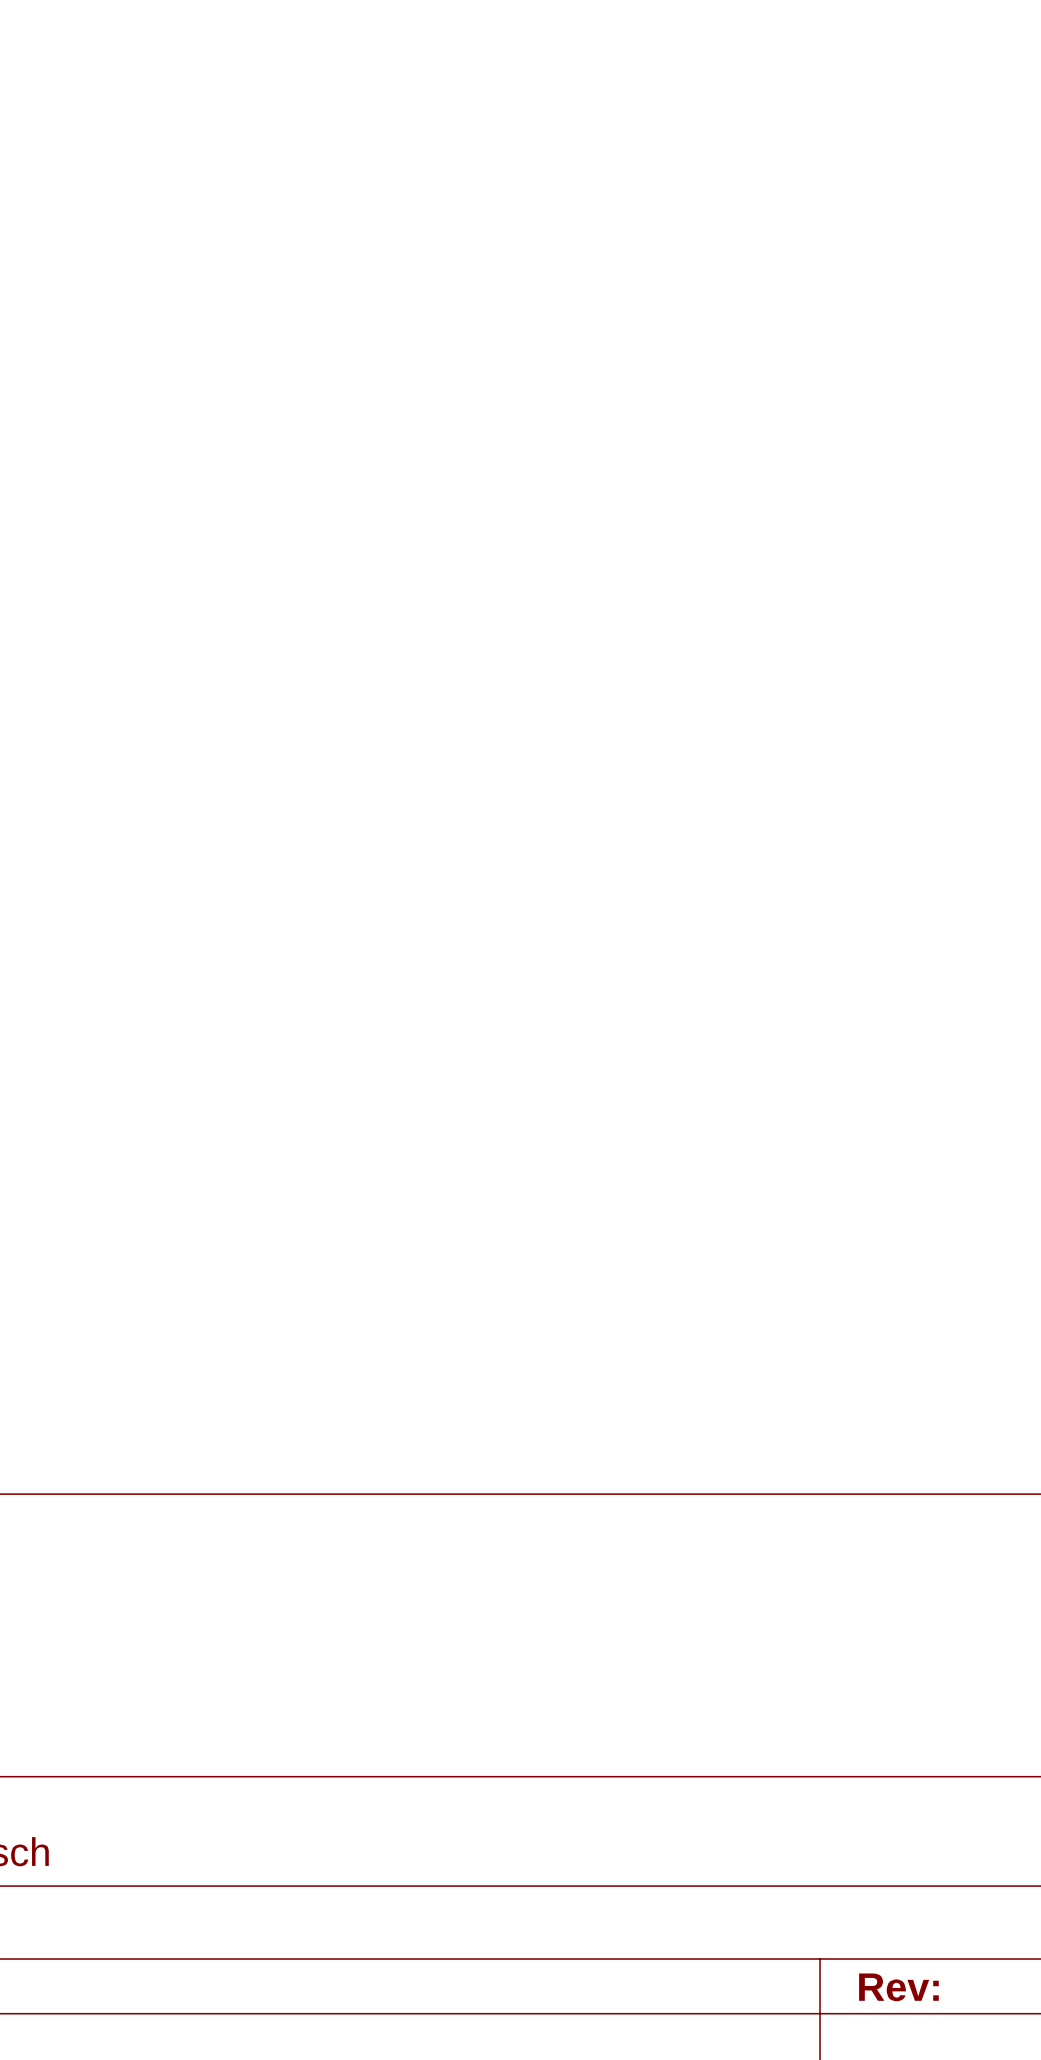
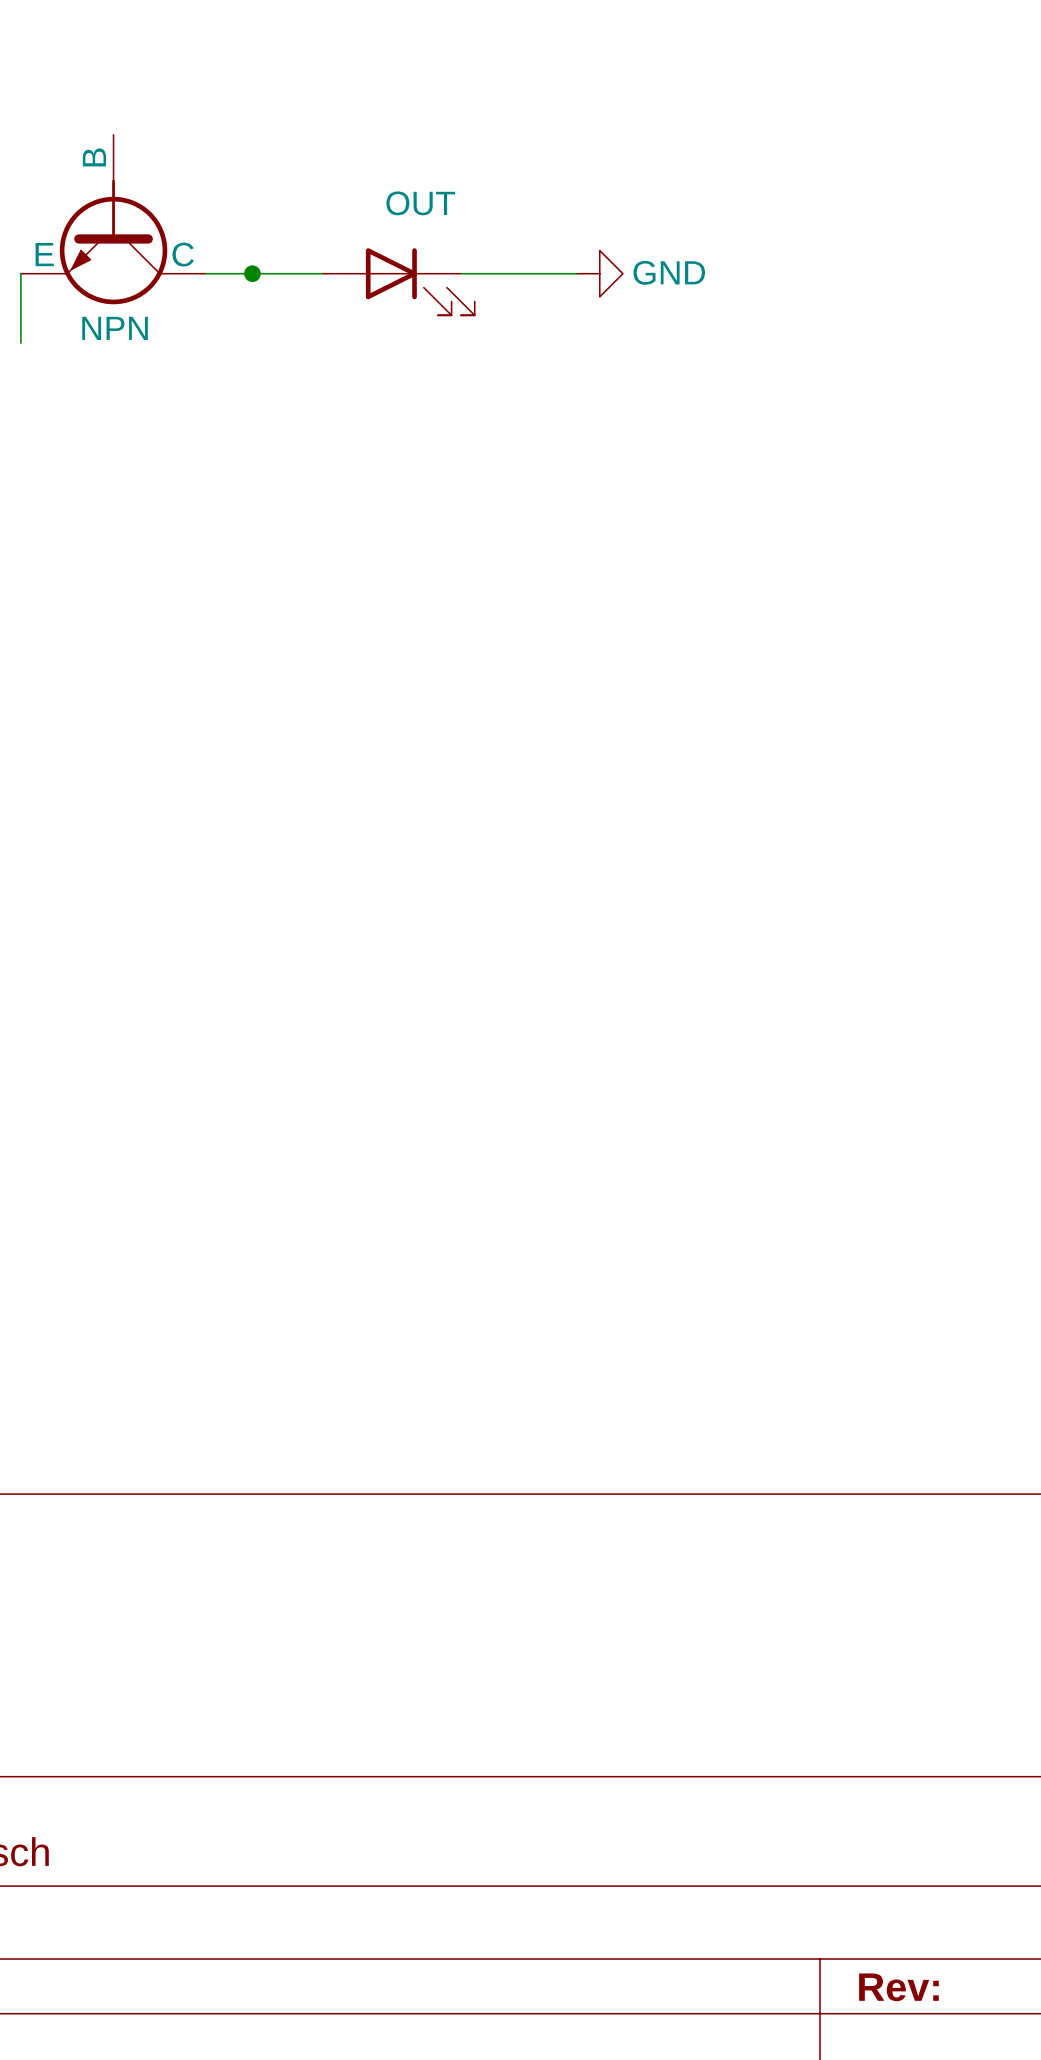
part: none -> NPN (113, 219)
wire: none -> (20, 273) (20, 343)
wire: none -> (206, 273) (321, 273)
junction: none -> (252, 273)
wire: none -> (460, 273) (576, 273)
power symbol: none -> GND (599, 273)
part: none -> OUT (398, 281)

